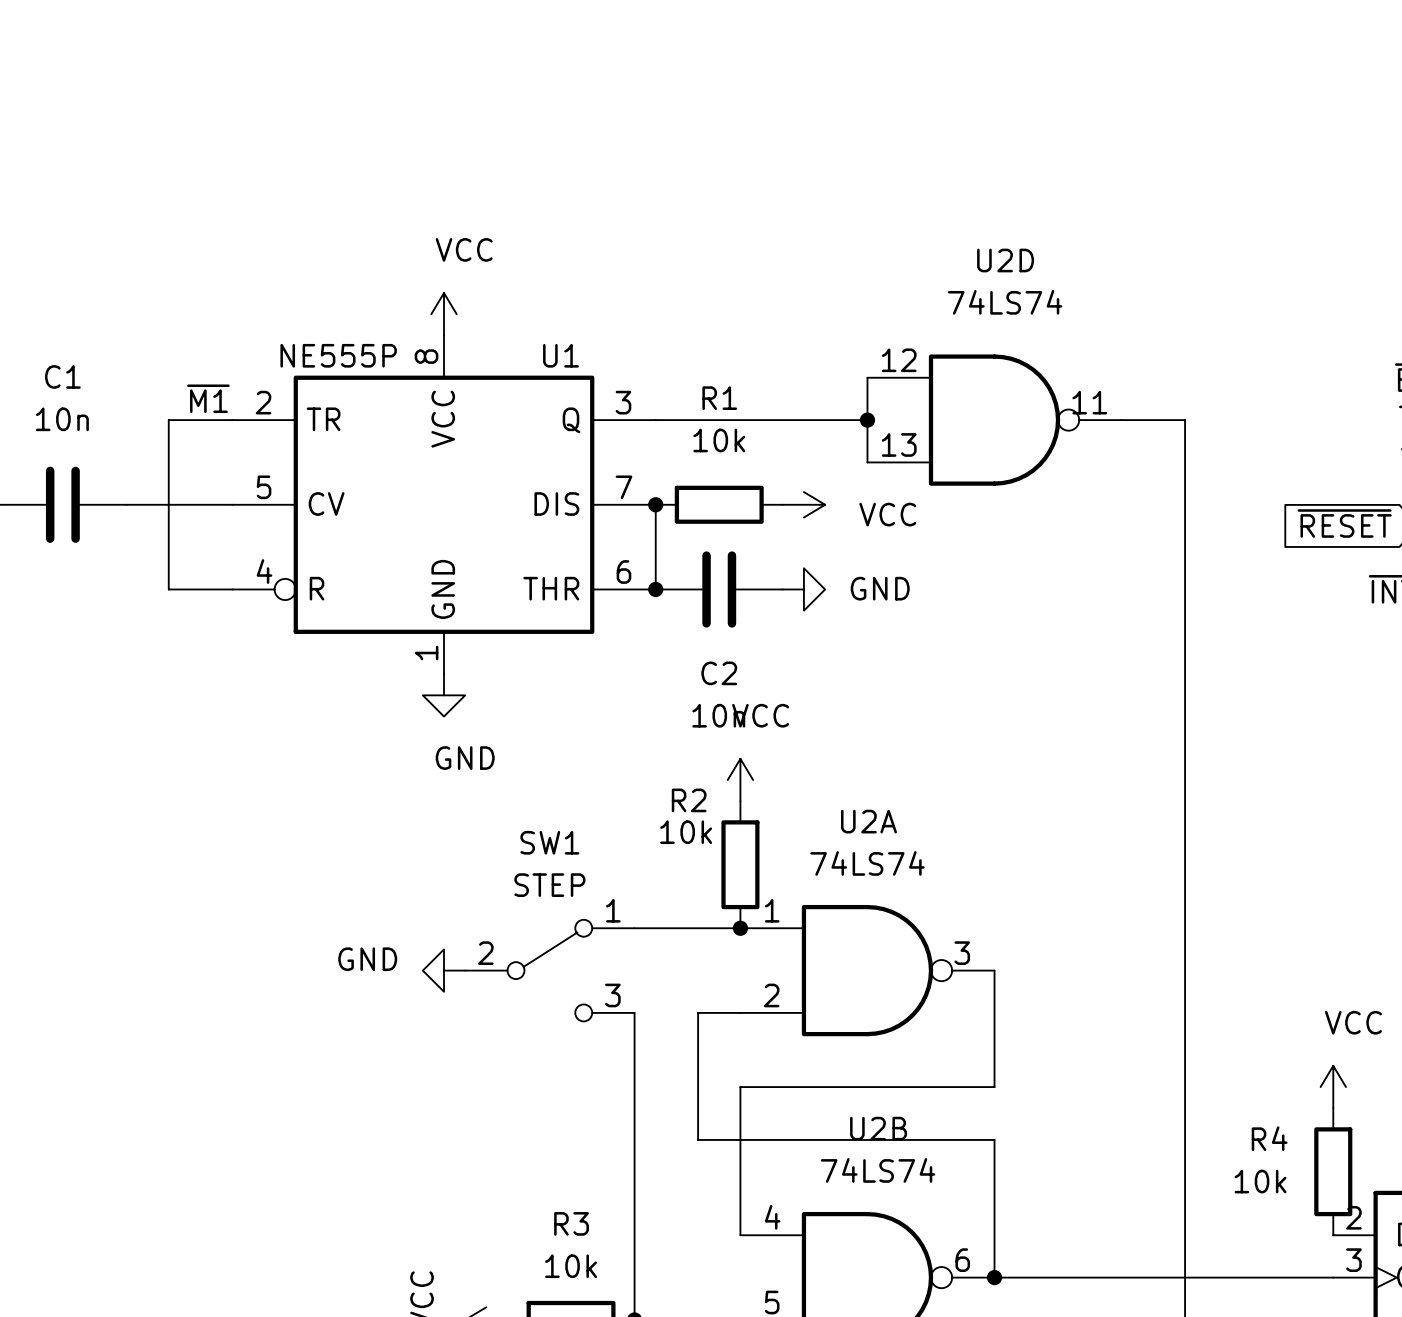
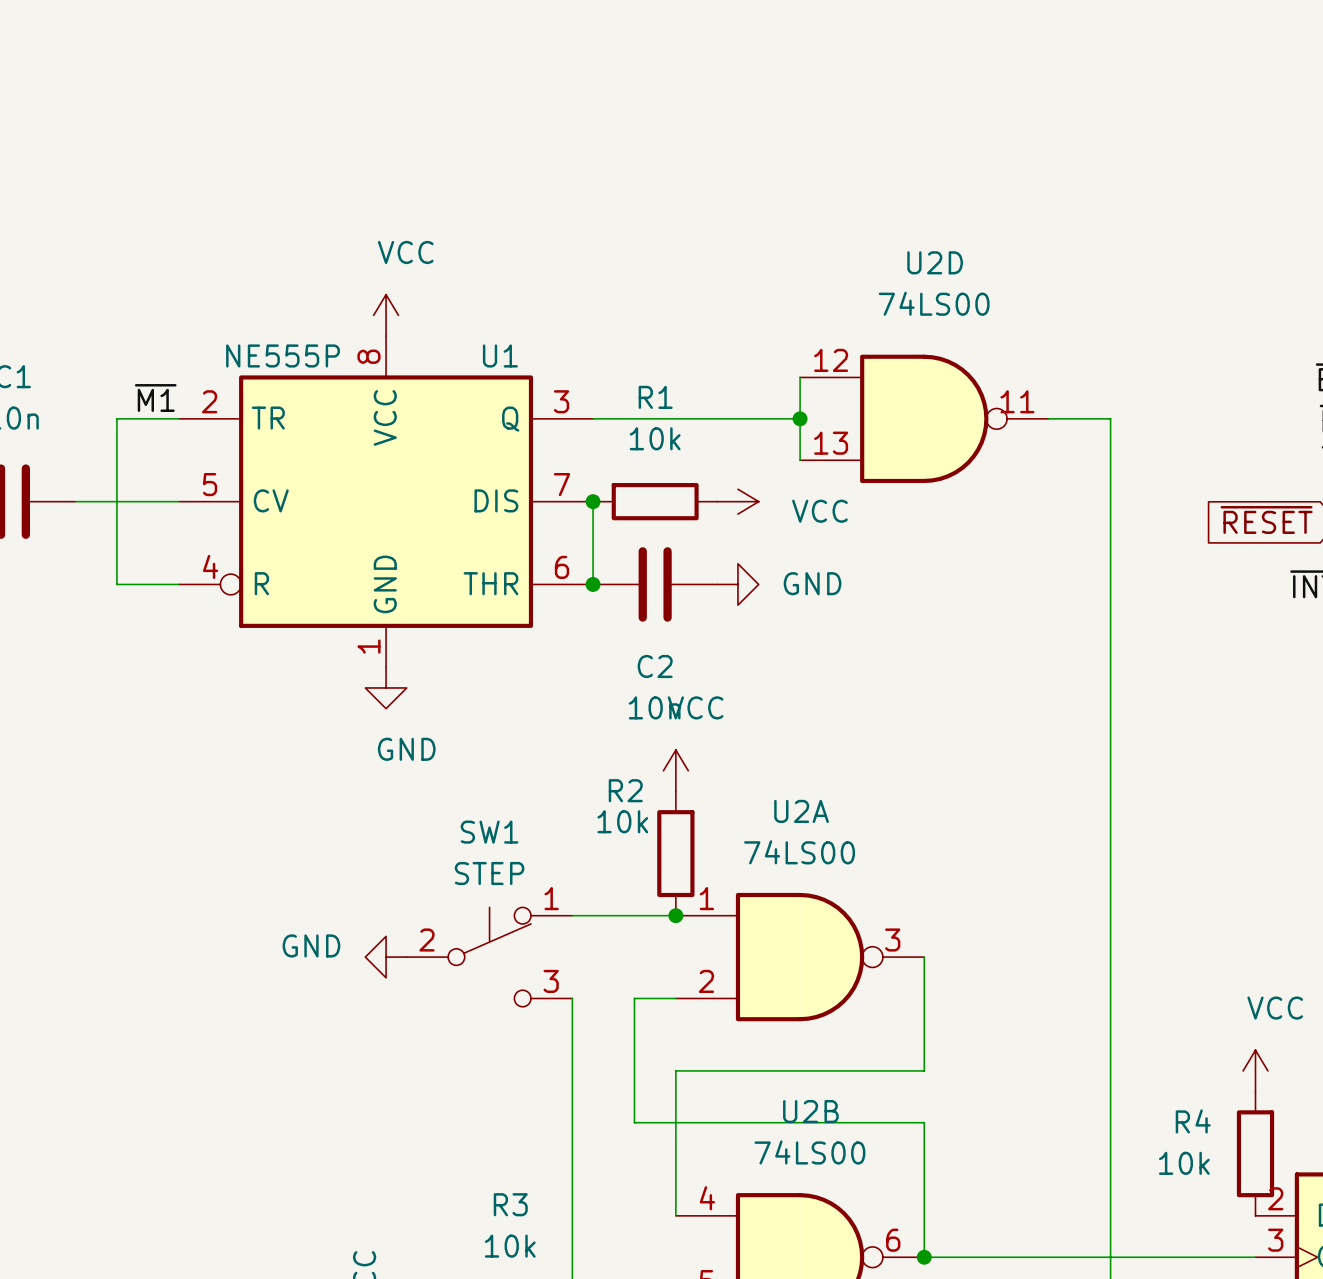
U2D value: 74LS74 (1005, 302) -> 74LS00 (934, 303)
U2A value: 74LS74 (867, 863) -> 74LS00 (799, 852)
SW1 symbol: [465, 919, 635, 1022] -> [406, 907, 573, 1007]
U2B value: 74LS74 (878, 1170) -> 74LS00 (809, 1152)

